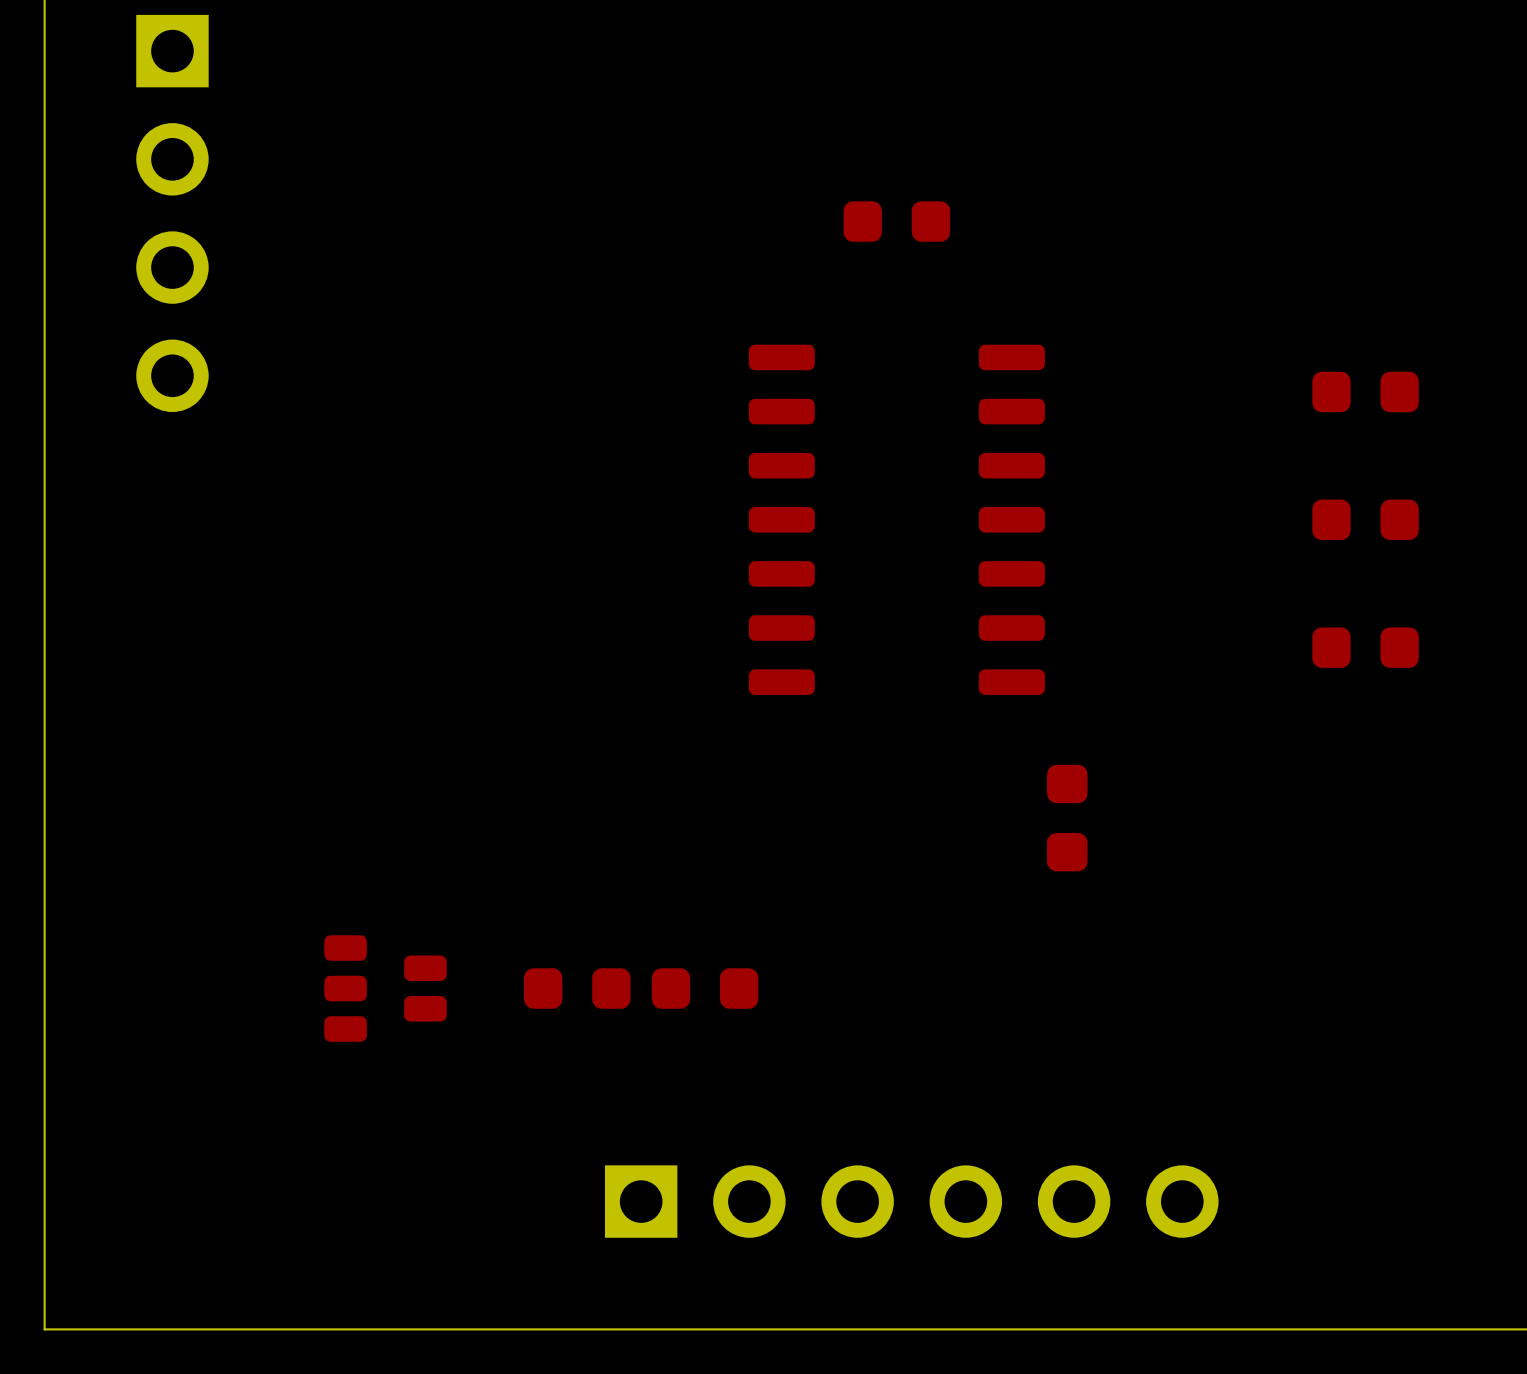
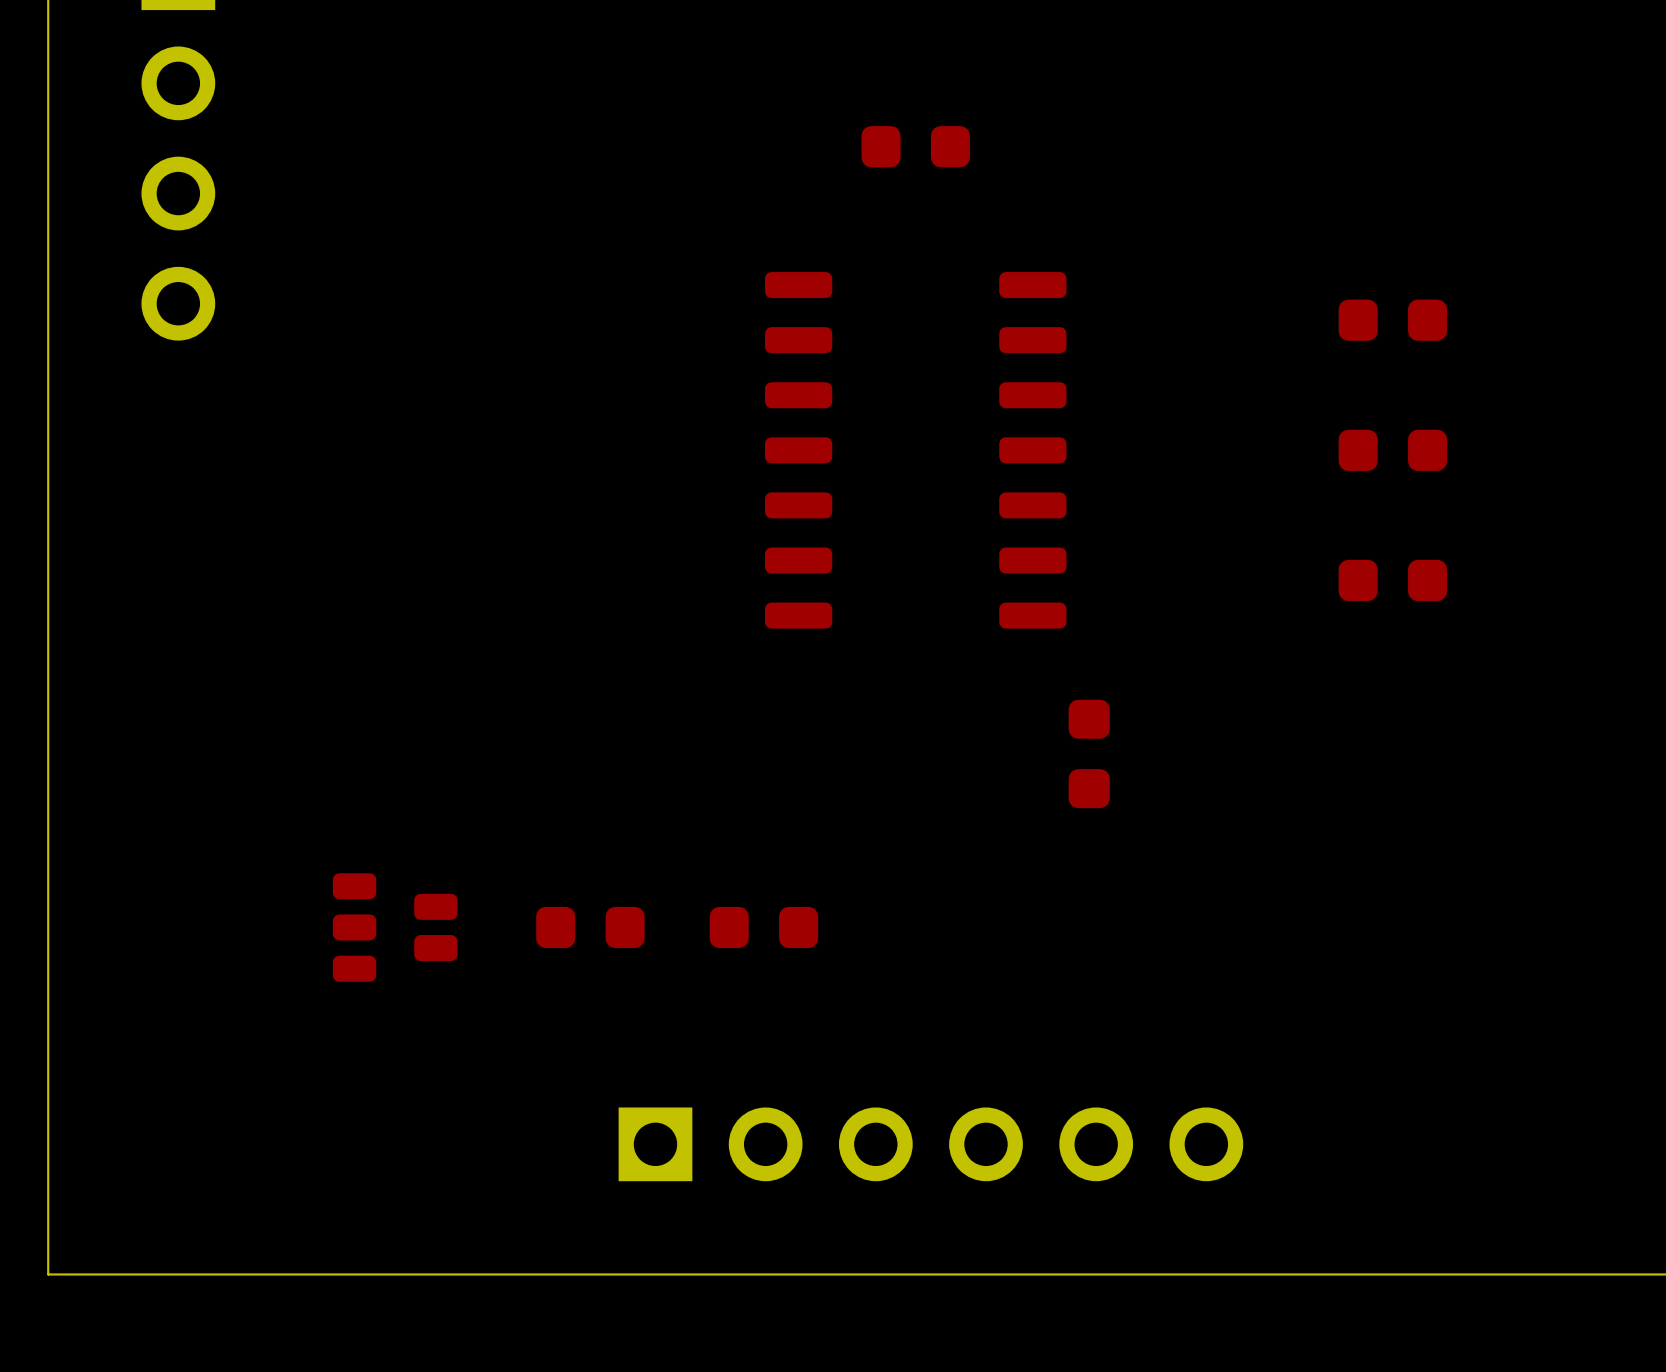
part position: (705, 988) -> (763, 927)

